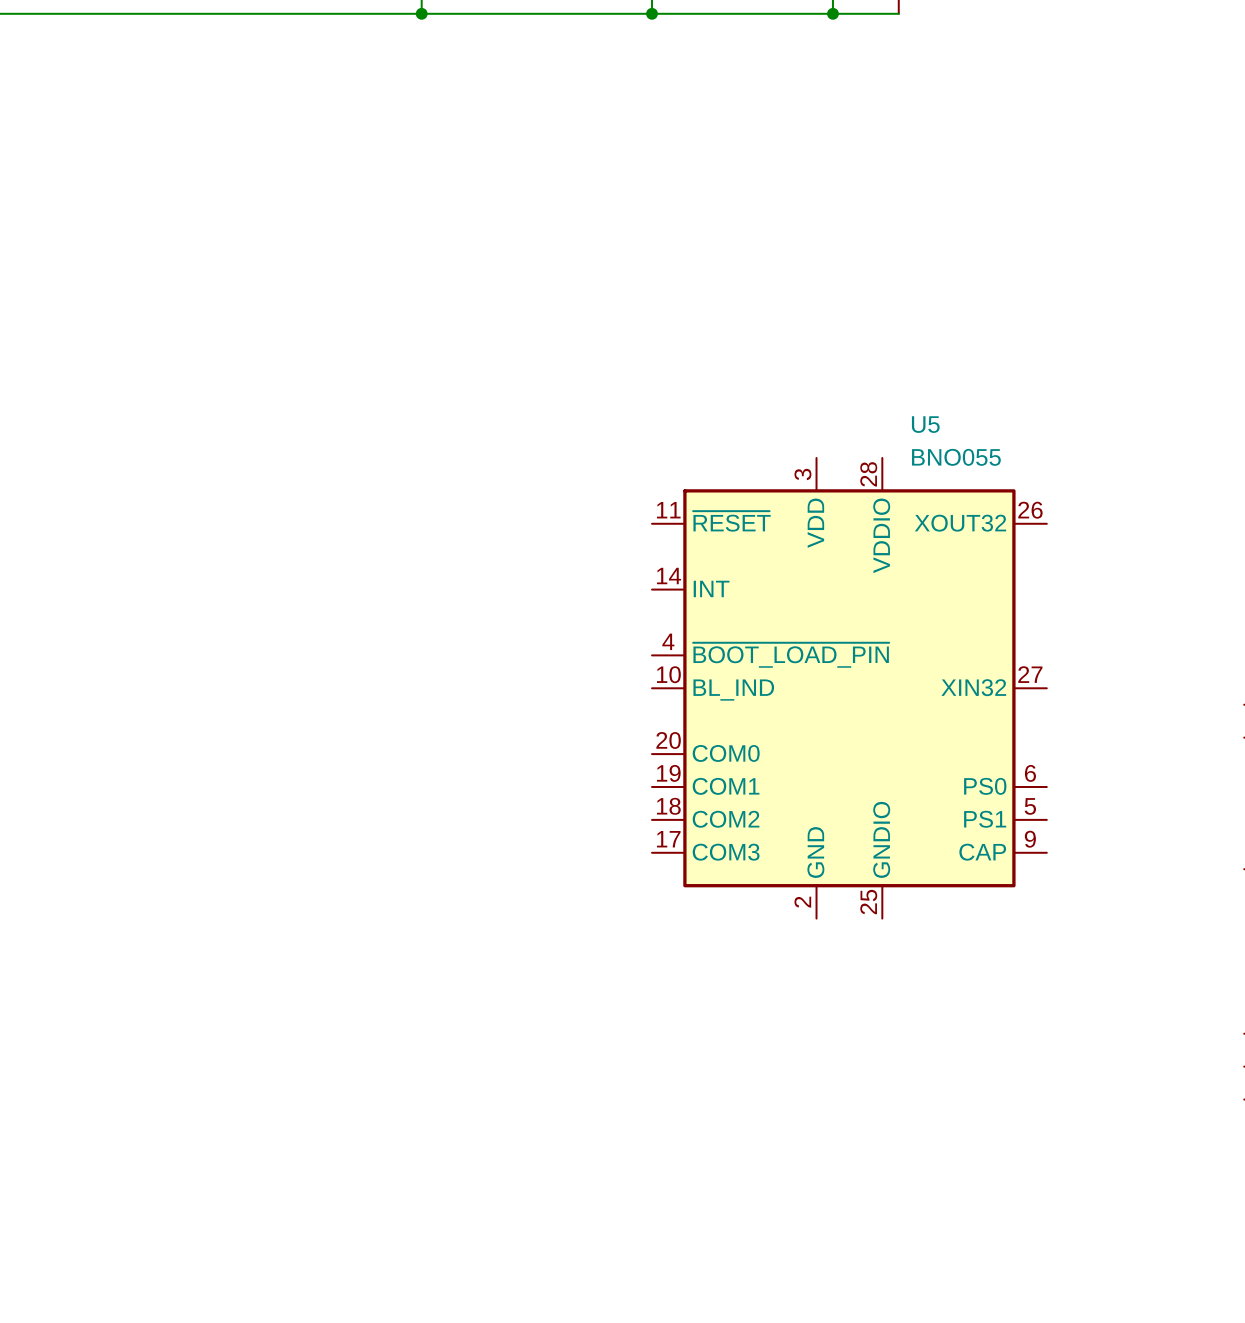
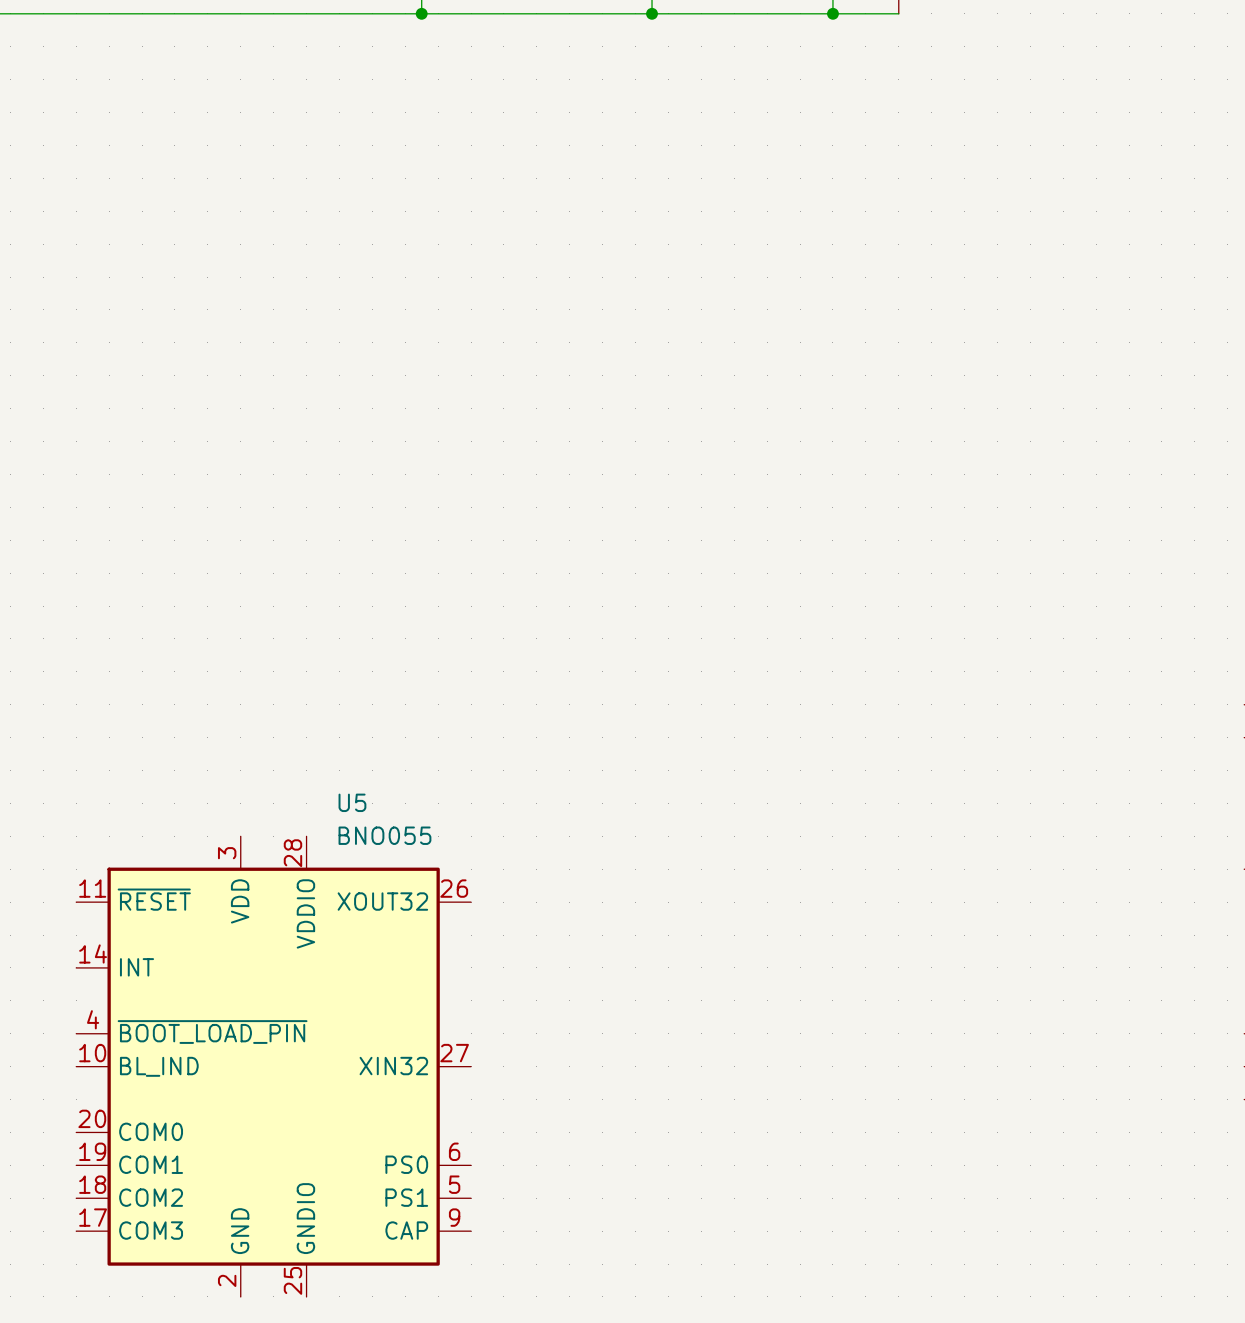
U5 position: (849, 688) -> (273, 1066)

